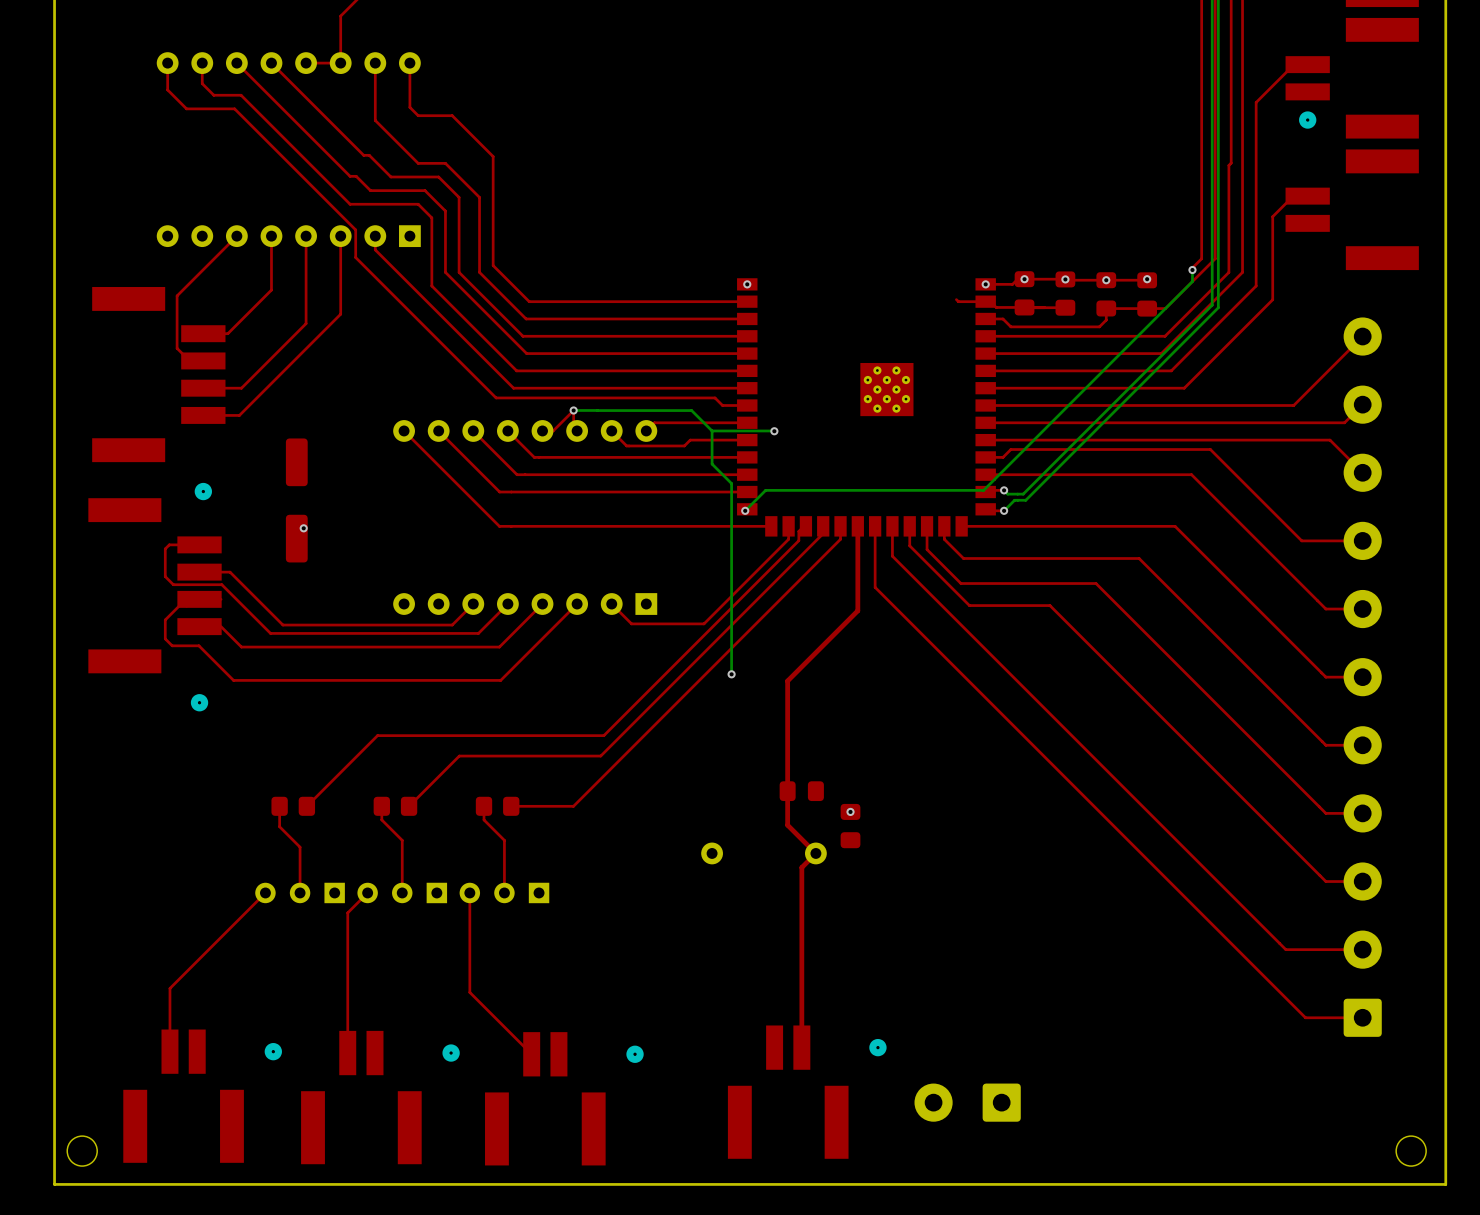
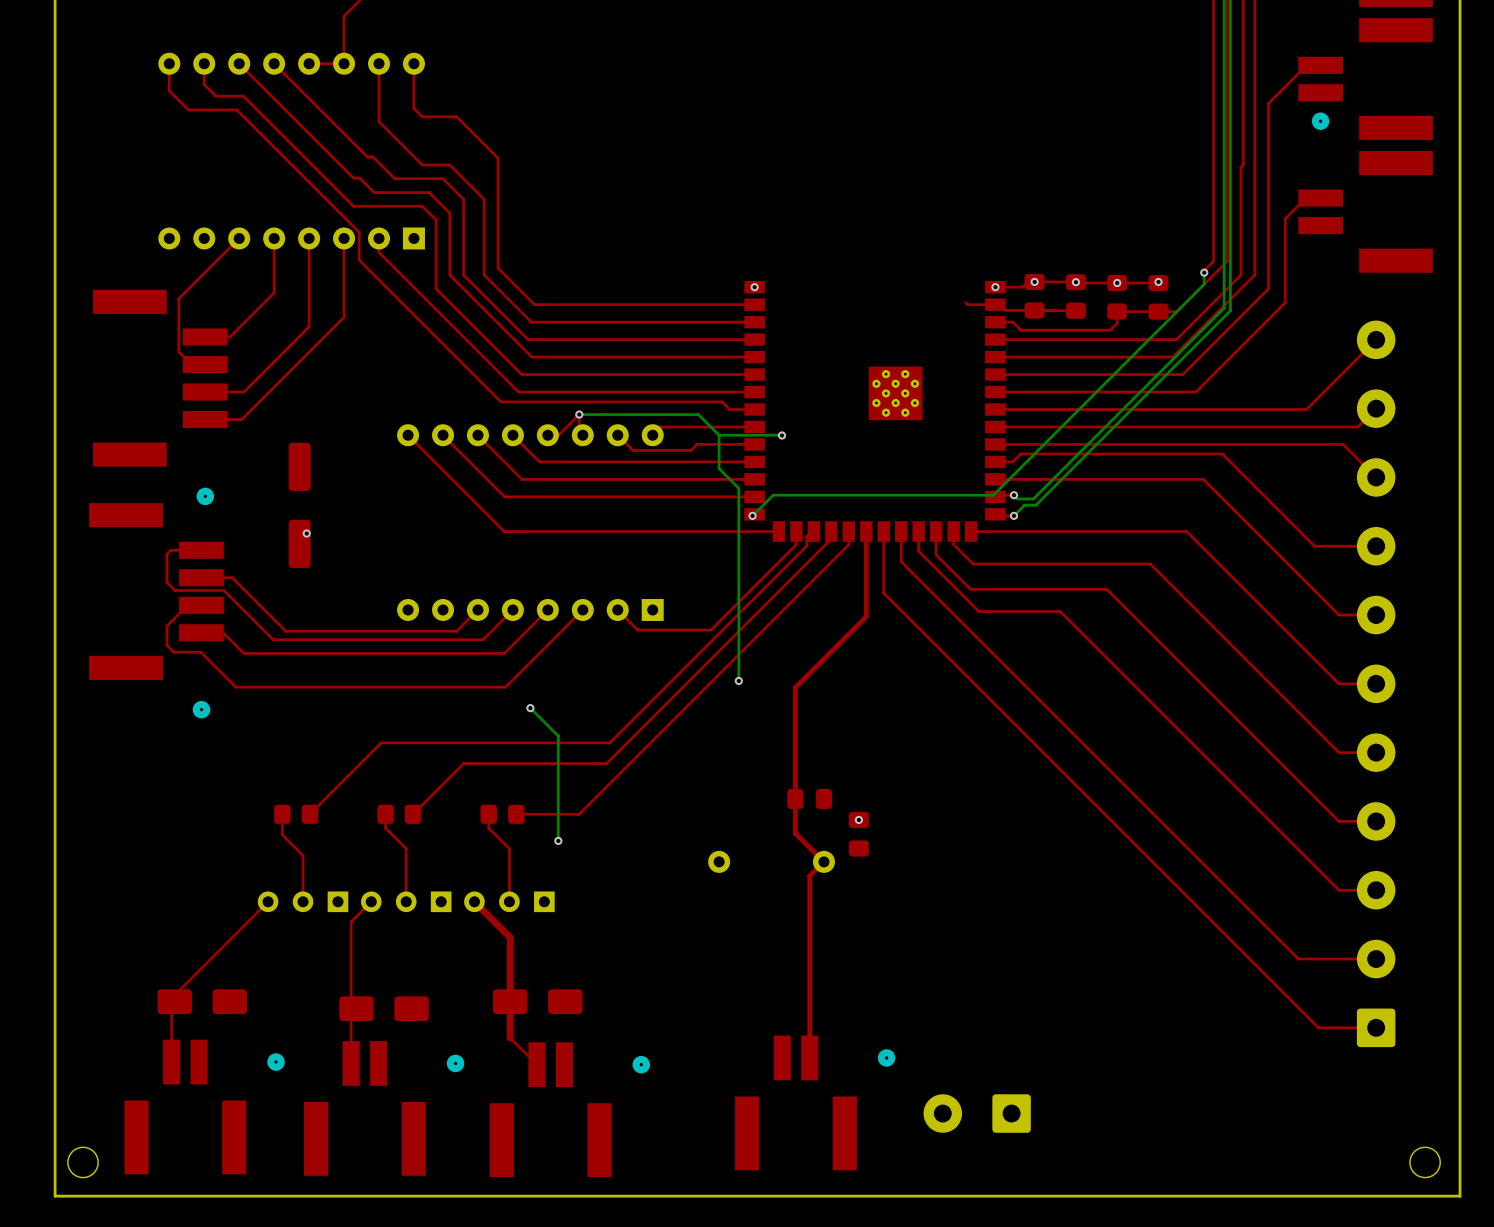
bottom track: none -> (530, 708) (558, 736) (558, 840)
via: none -> (530, 708)
via: none -> (558, 840)
top track: (469, 892) (469, 992) (505, 1027) -> (474, 901) (510, 937) (510, 1038)
part: none -> (202, 1001)
part: none -> (537, 1001)
part: none -> (384, 1008)

